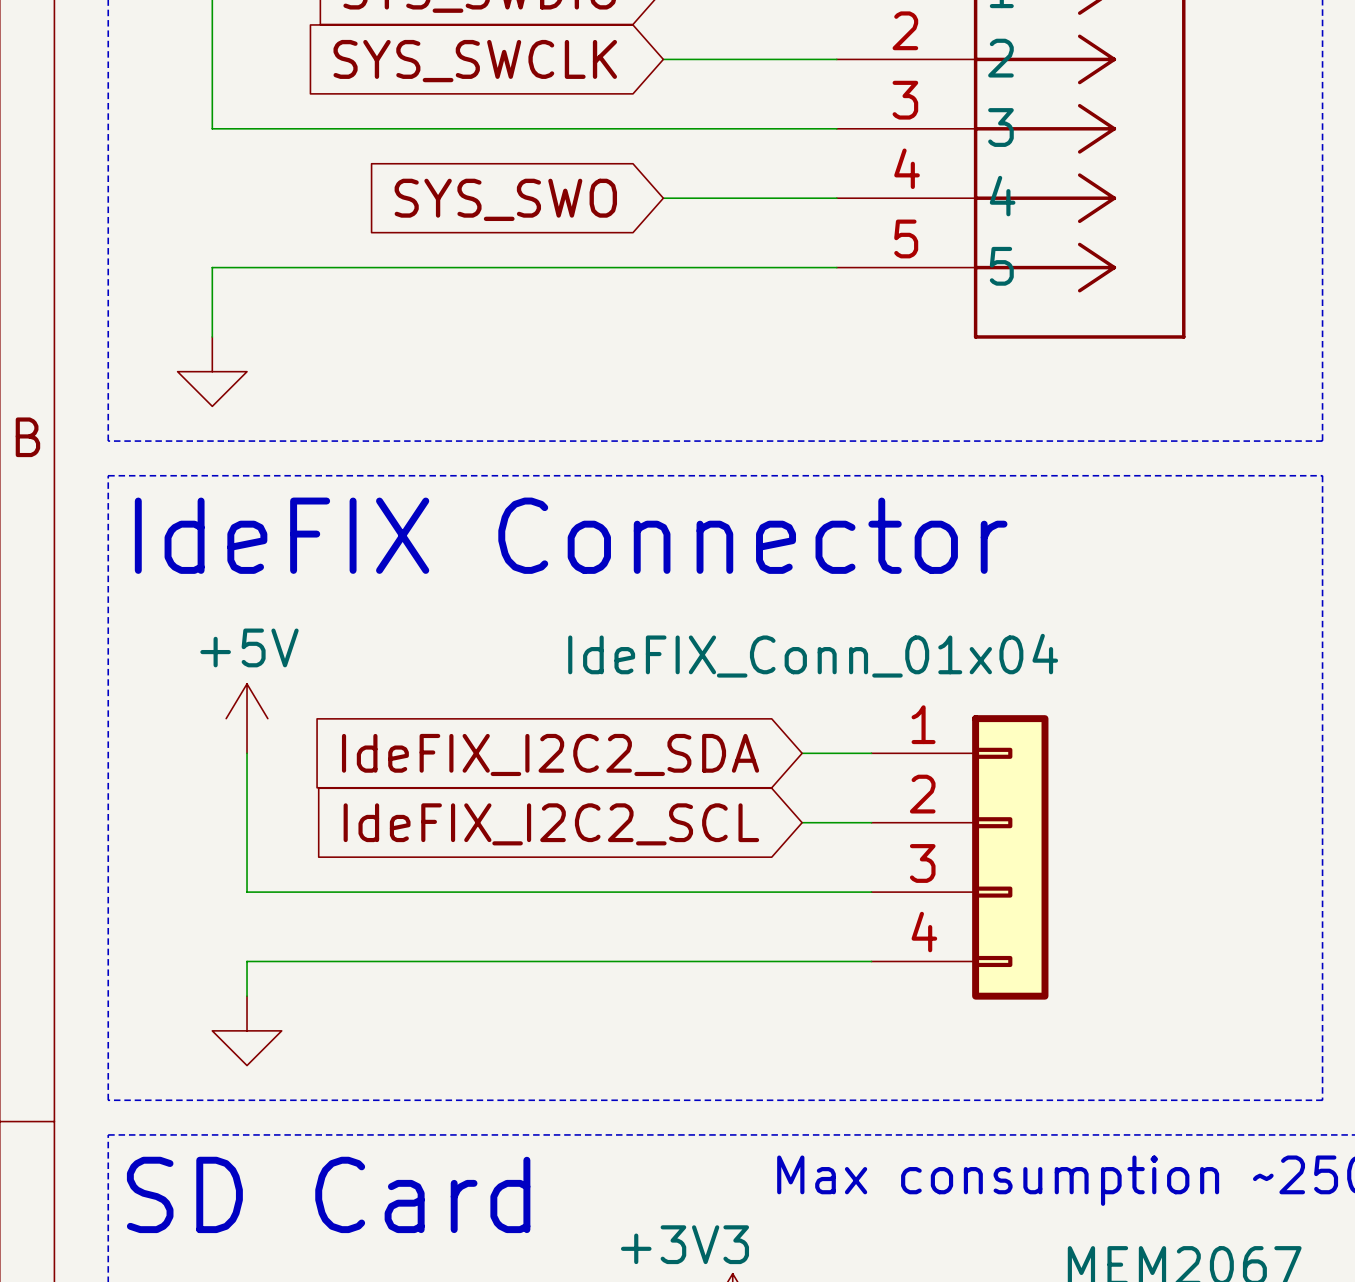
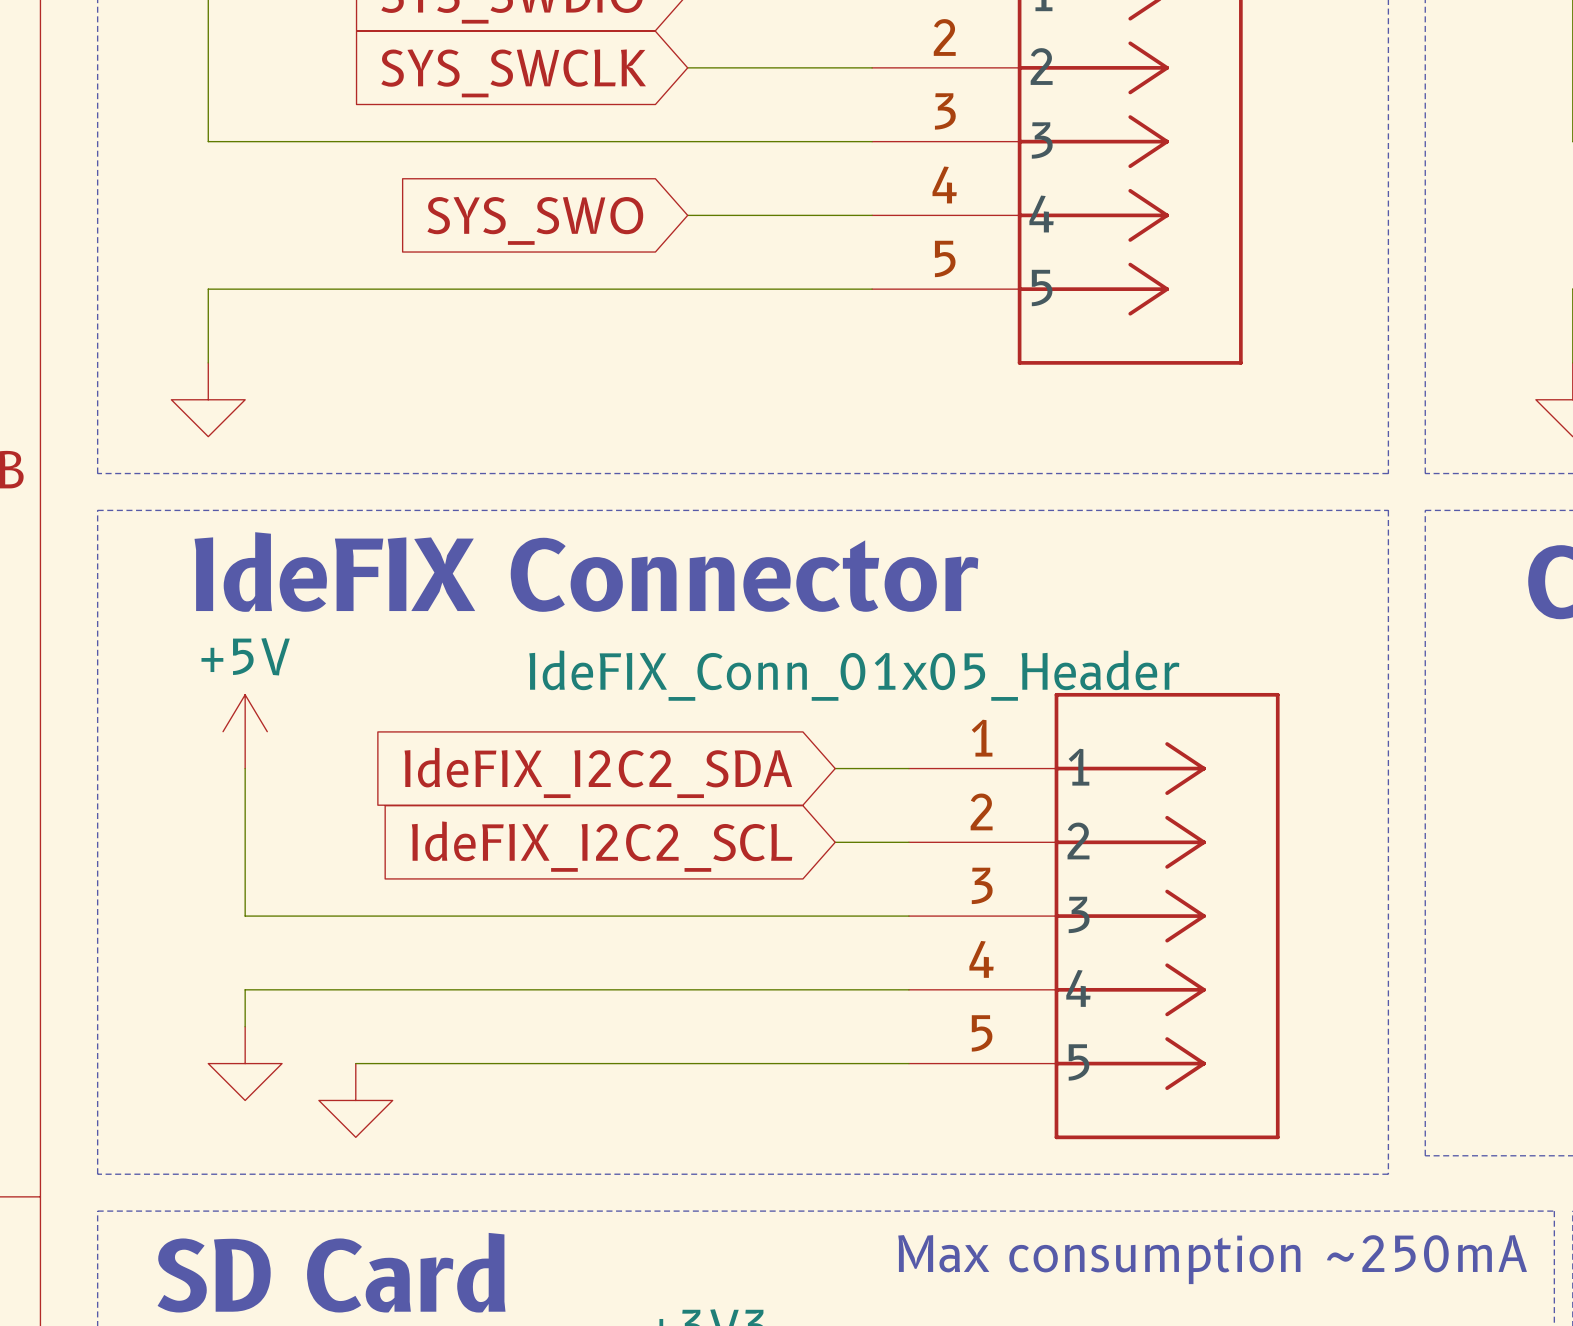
power symbol position: +5V (247, 718) -> +5V (245, 731)
wire: (802, 753) (871, 753) -> (835, 768) (908, 768)
global label position: IdeFIX_I2C2_SDA (550, 754) -> IdeFIX_I2C2_SDA (598, 772)
wire: (802, 822) (871, 822) -> (835, 842) (908, 842)
global label position: IdeFIX_I2C2_SCL (551, 824) -> IdeFIX_I2C2_SCL (602, 846)
wire: (247, 857) (247, 892) (871, 892) -> (245, 916) (908, 916)
part: IdeFIX_Conn_01x04 (959, 857) -> none
part: none -> IdeFIX_Conn_01x05_Header (1094, 916)
wire: (871, 961) (247, 961) (247, 996) -> (908, 989) (245, 989) (245, 1026)
wire: none -> (355, 1063) (908, 1063)
power symbol position: (247, 1030) -> (245, 1063)
power symbol: none -> (355, 1100)

